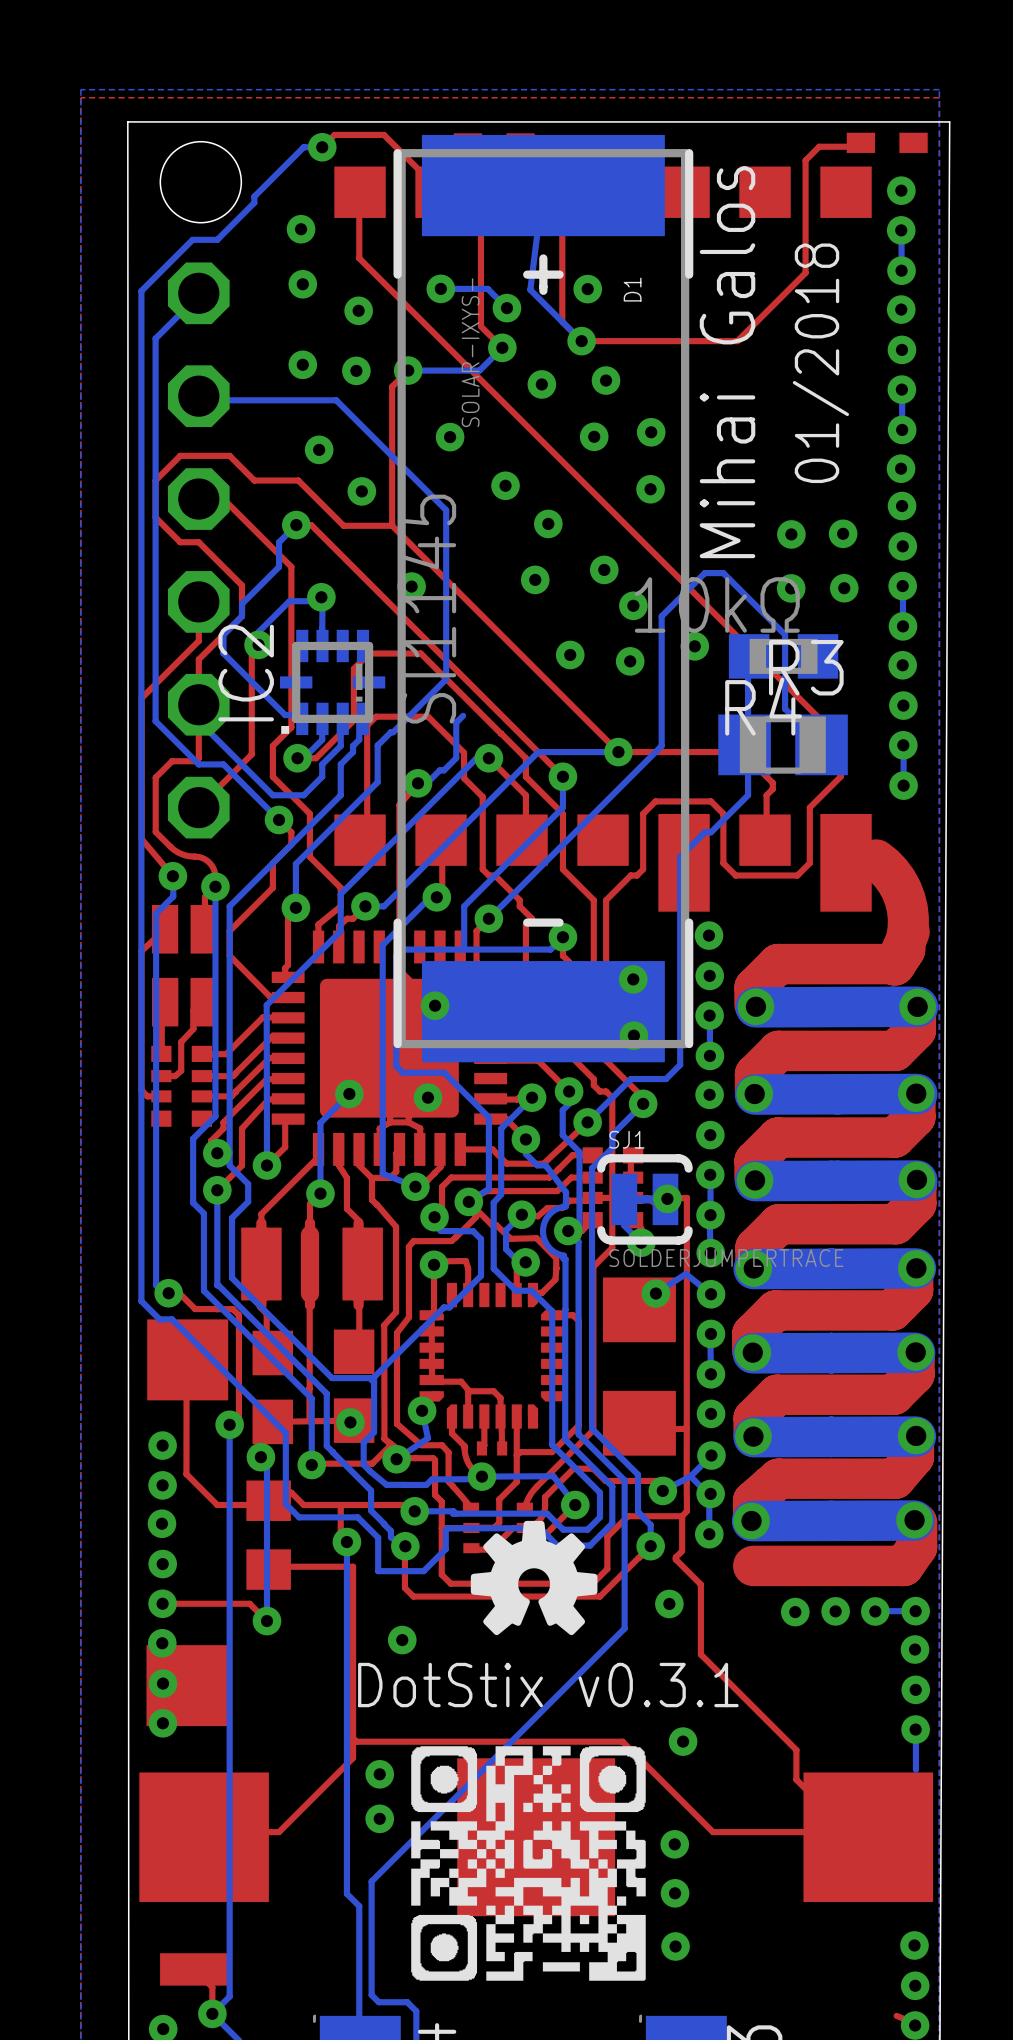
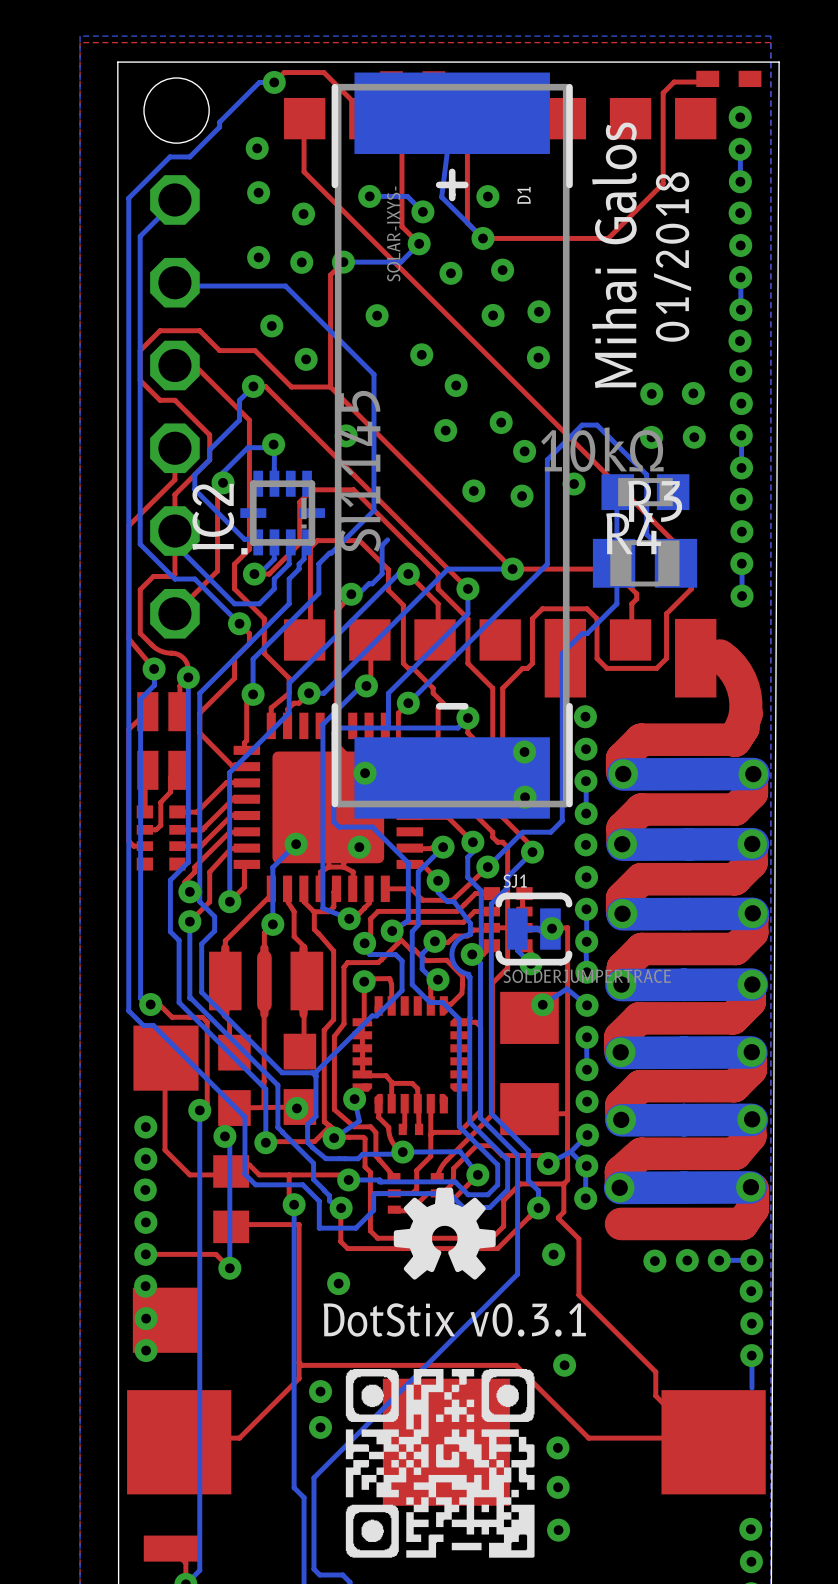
text position: Mihai Galos (727, 362) -> Mihai Galos (614, 255)

